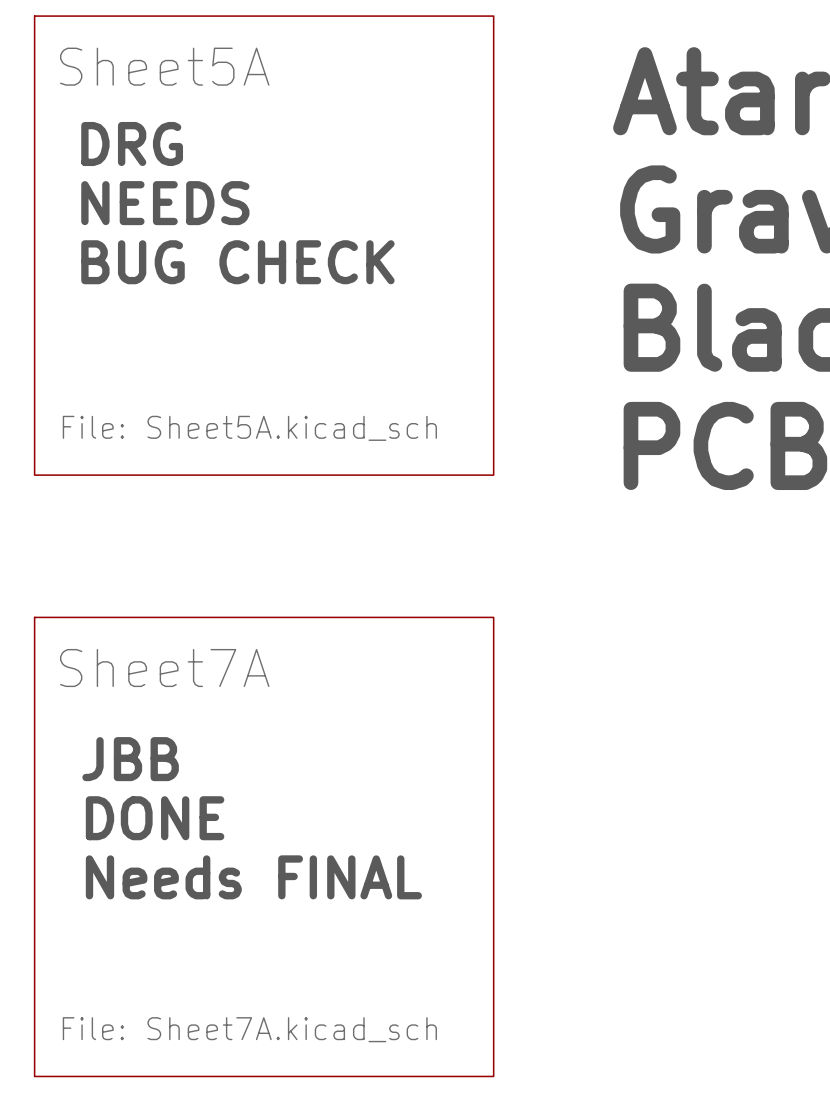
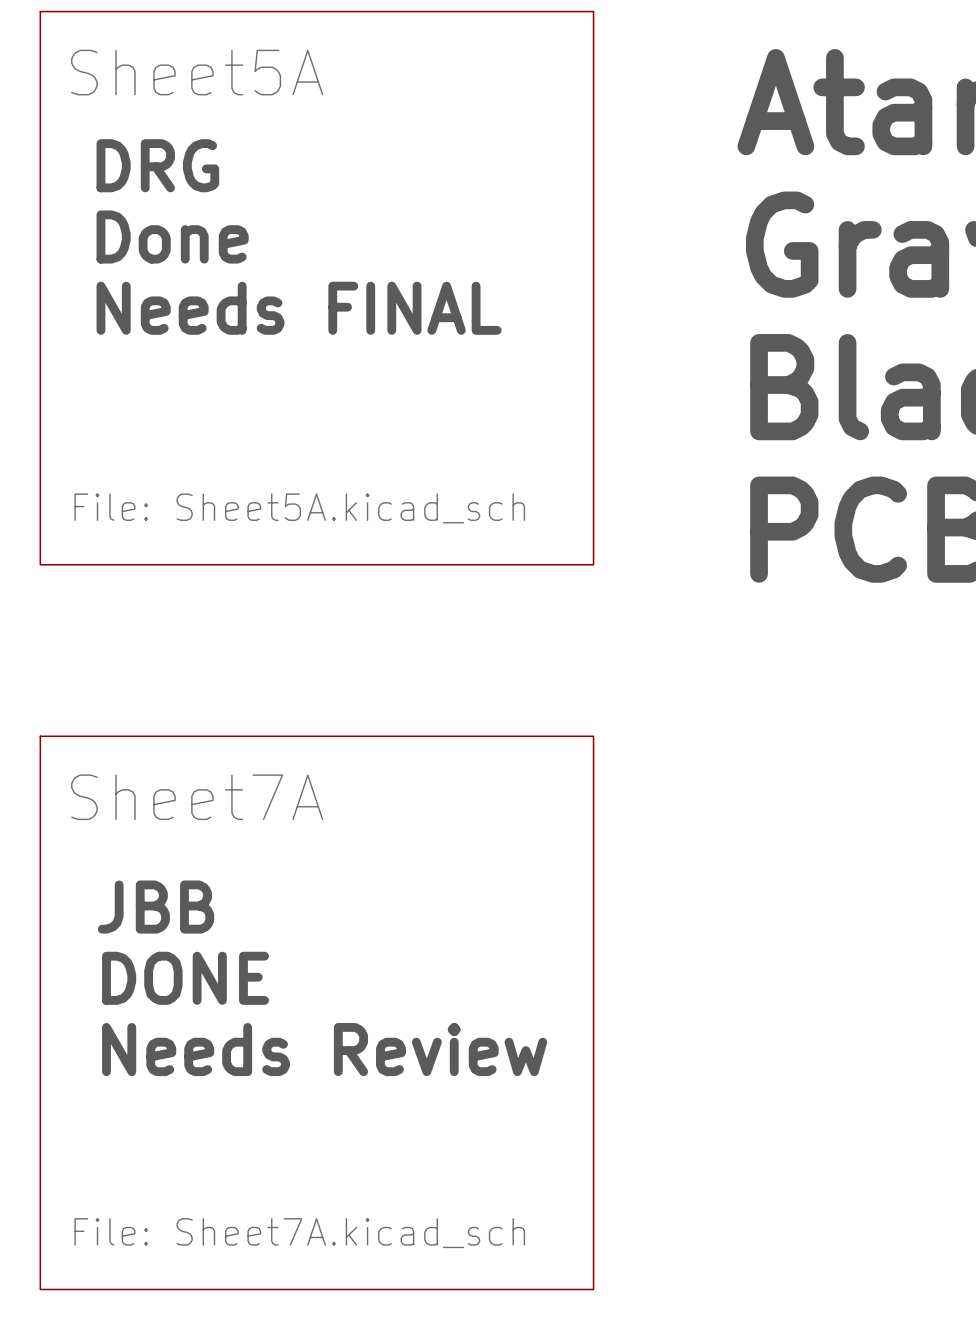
text: NEEDS (165, 203) -> Done (172, 236)
text: BUG CHECK (237, 262) -> Needs FINAL (299, 308)
text: Needs FINAL (253, 877) -> Needs Review (324, 1049)

